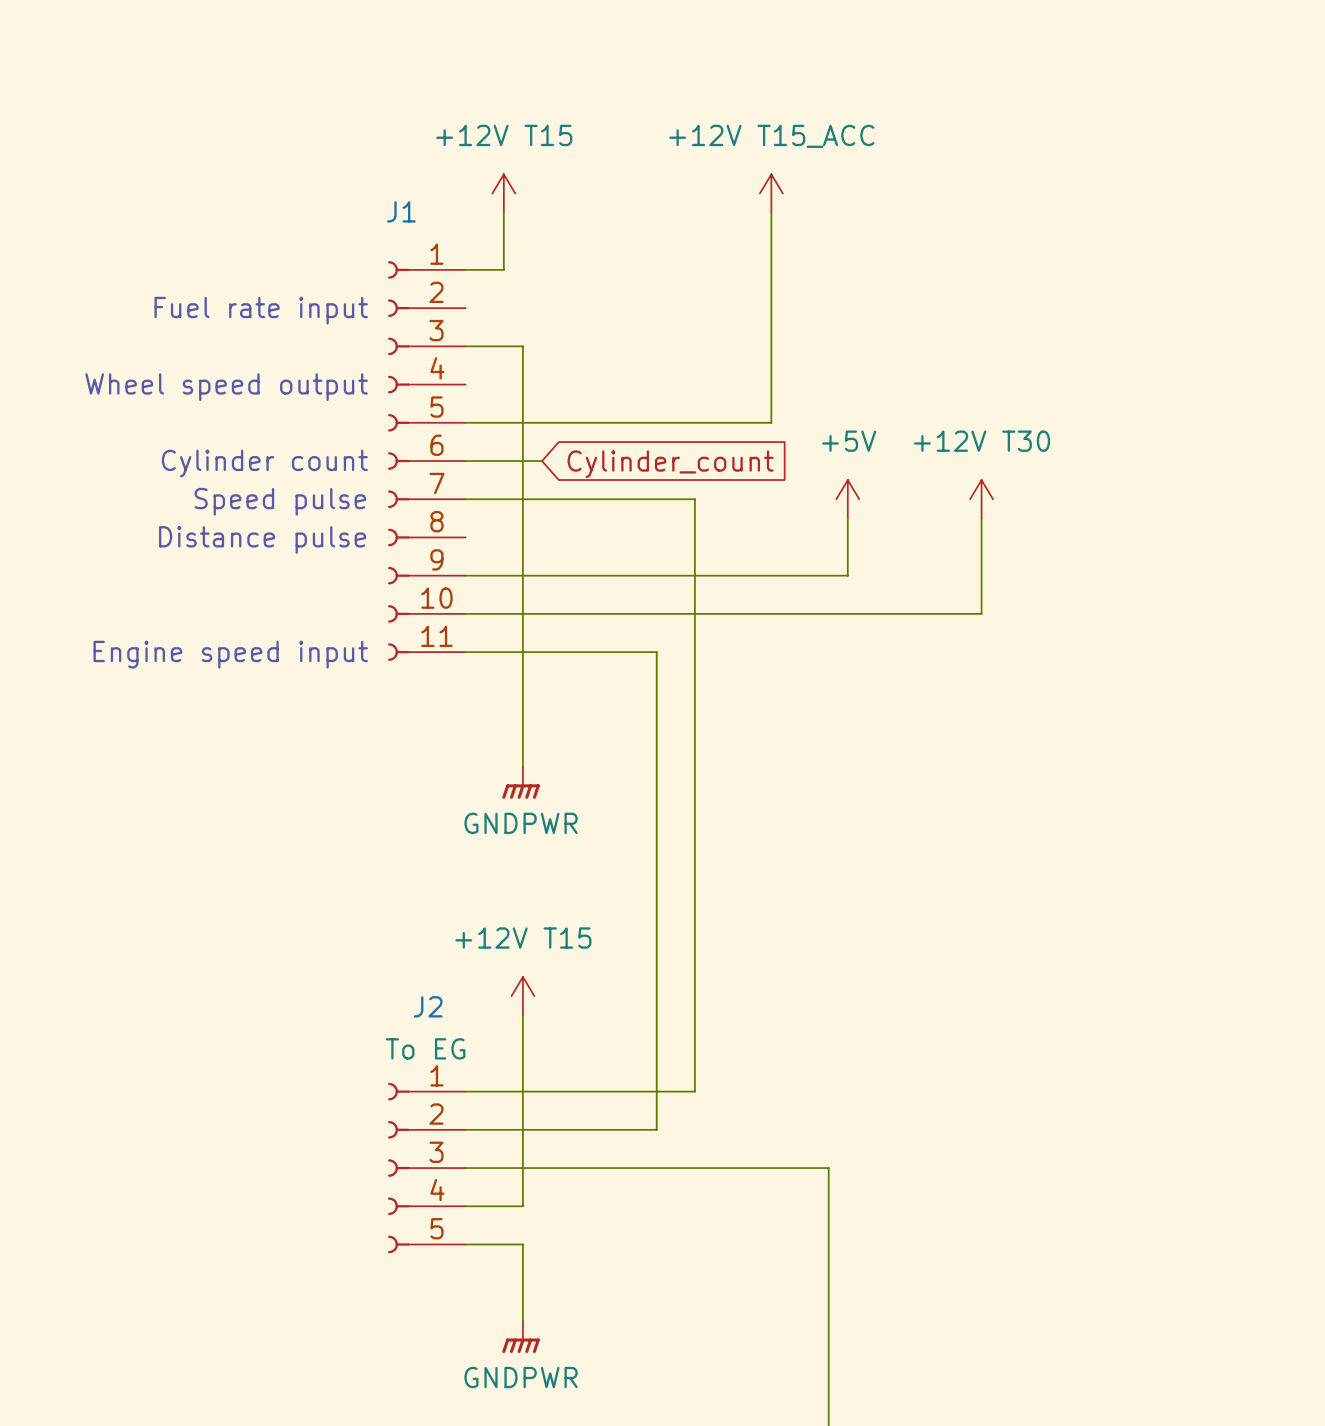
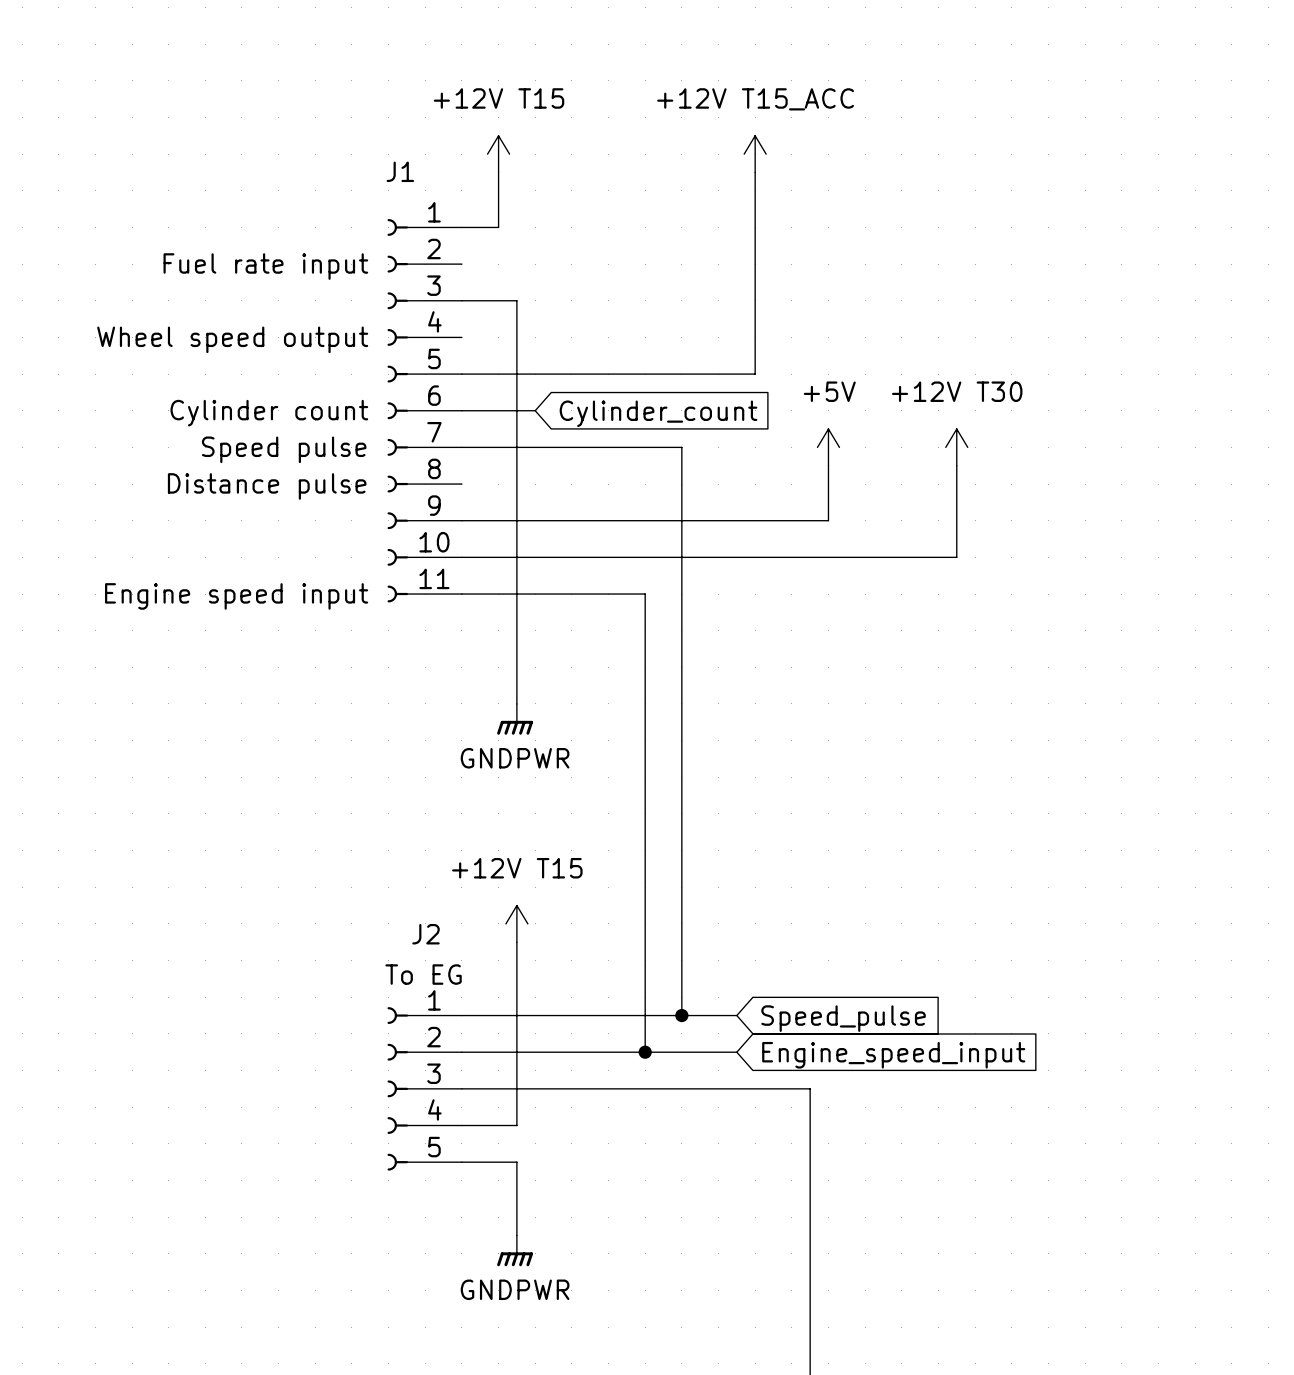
wire: none -> (681, 1015) (736, 1015)
junction: none -> (681, 1015)
global label: none -> Speed_pulse (843, 1018)
wire: none -> (645, 1052) (736, 1052)
junction: none -> (645, 1052)
global label: none -> Engine_speed_input (893, 1055)

